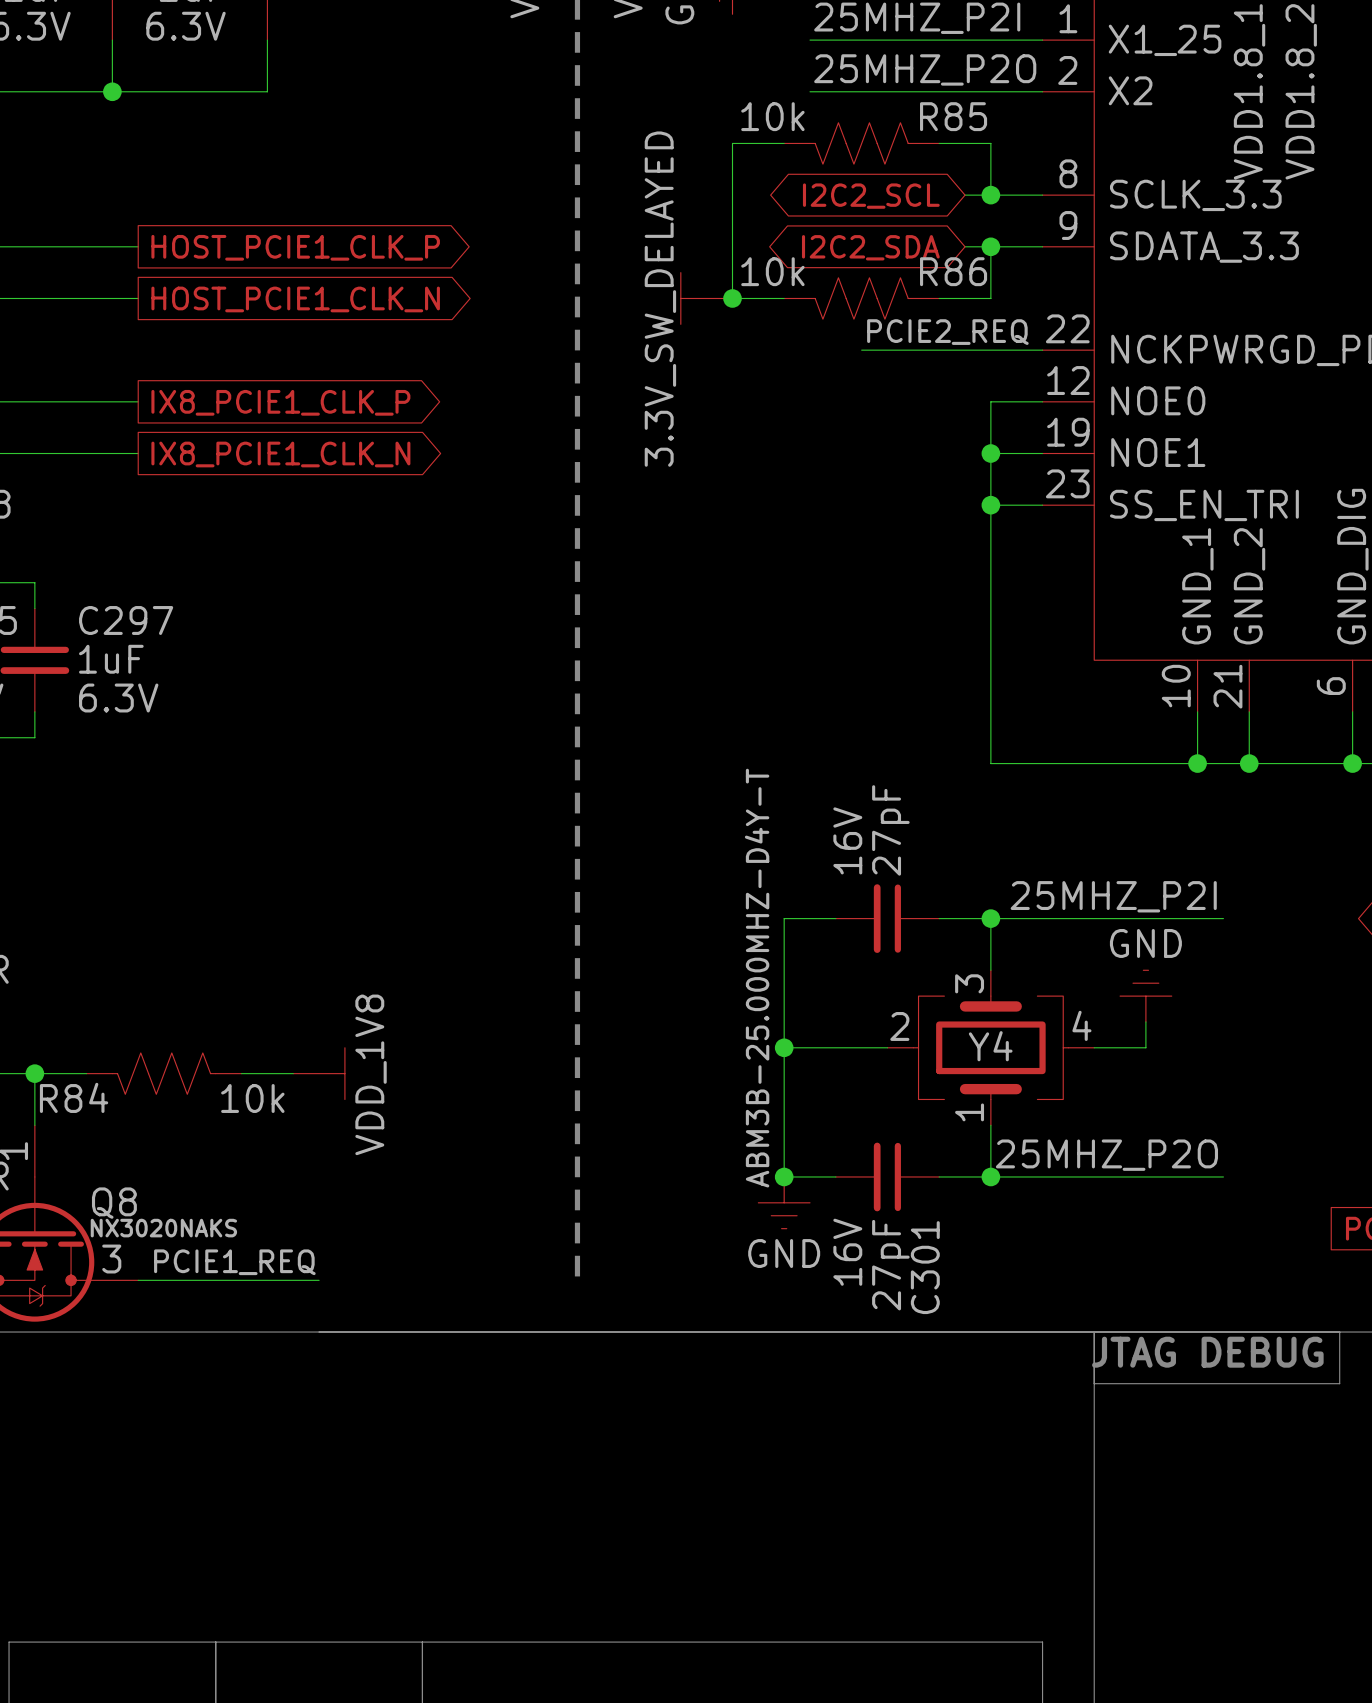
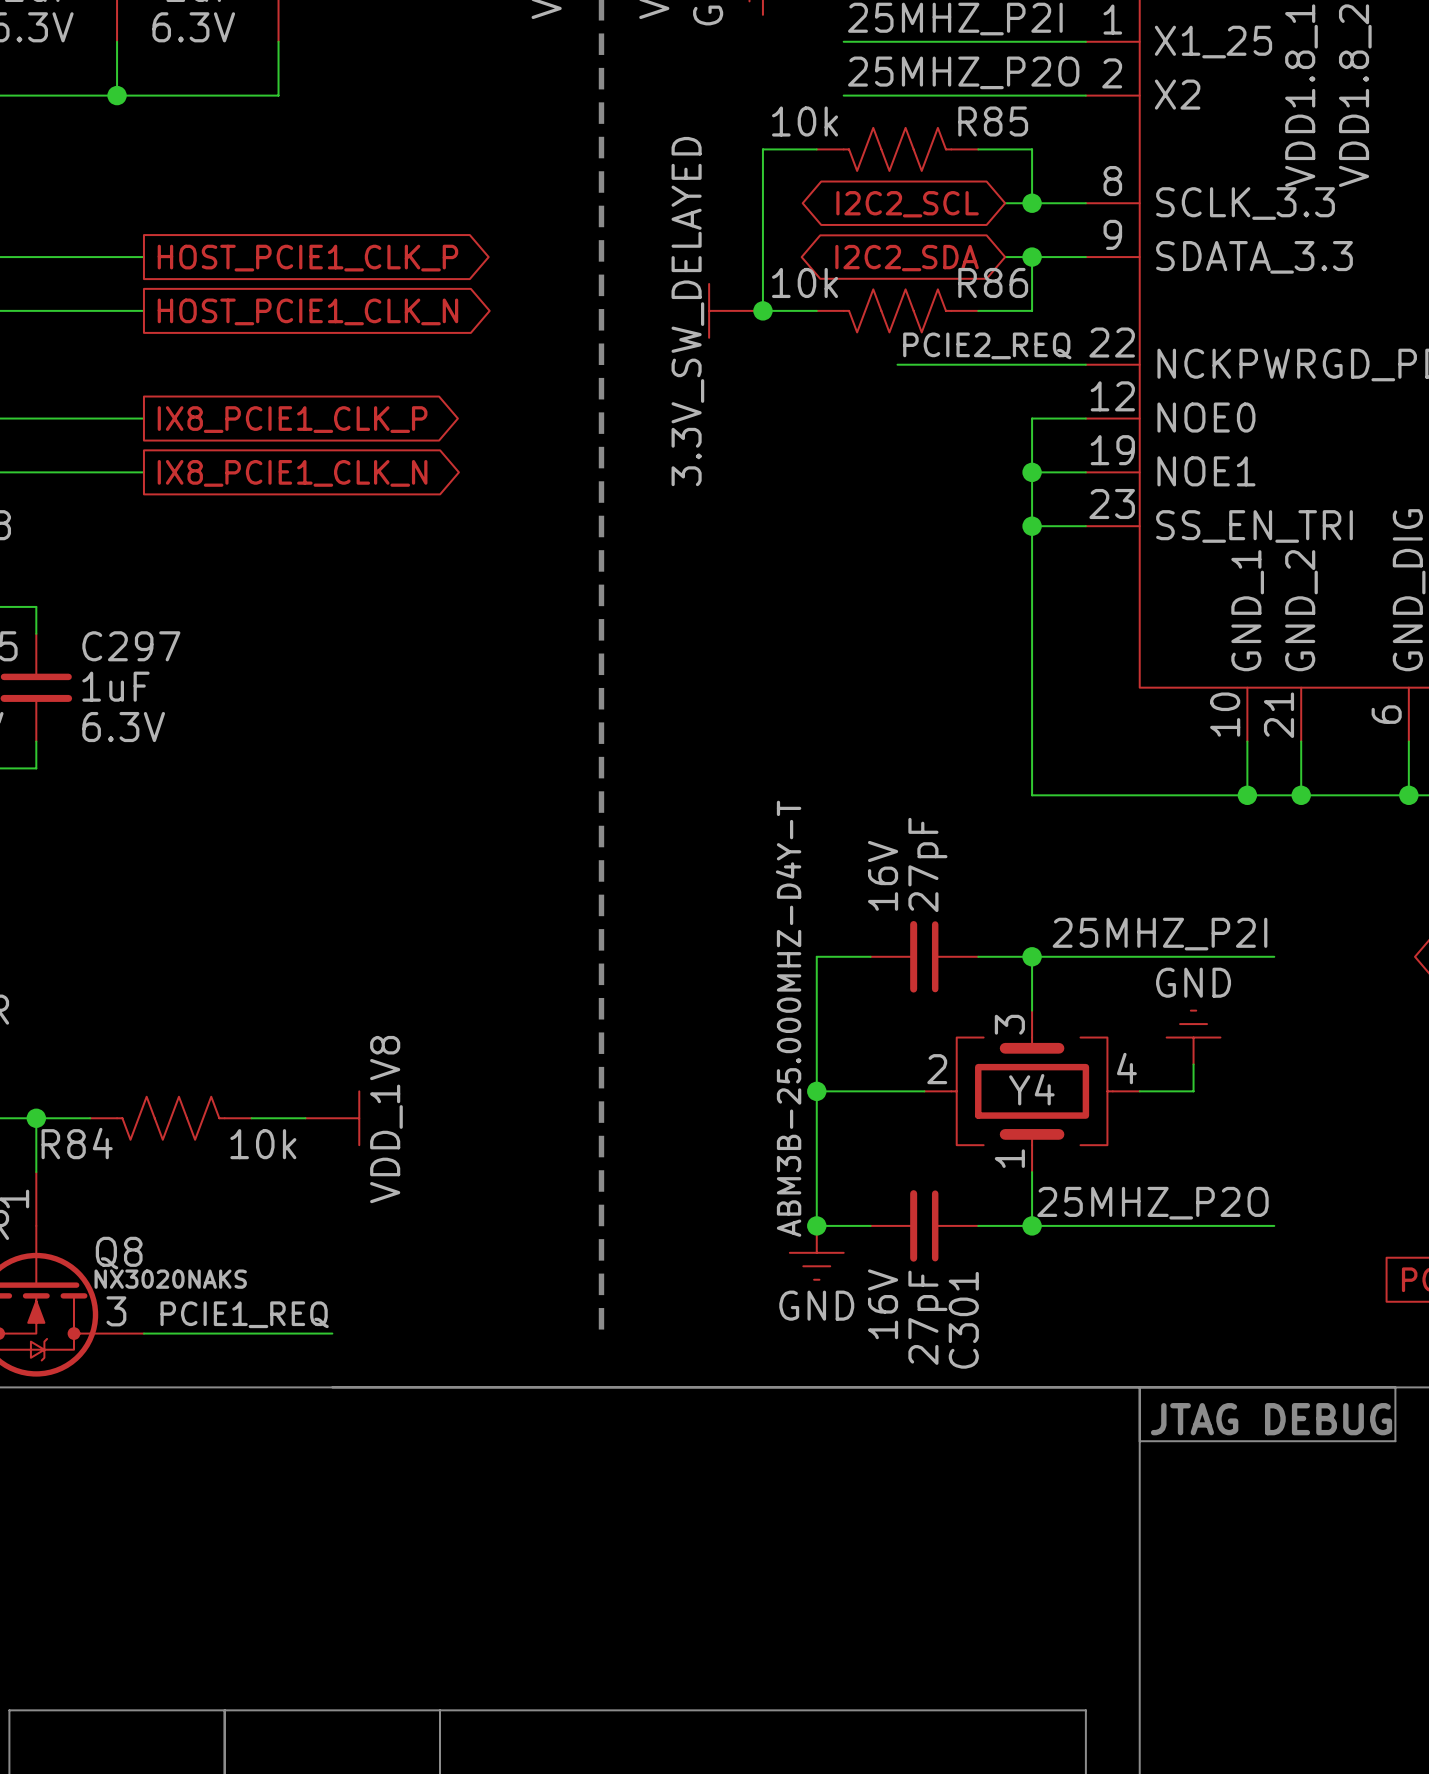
text position: JTAG DEBUG (1207, 1352) -> JTAG DEBUG (1271, 1419)

